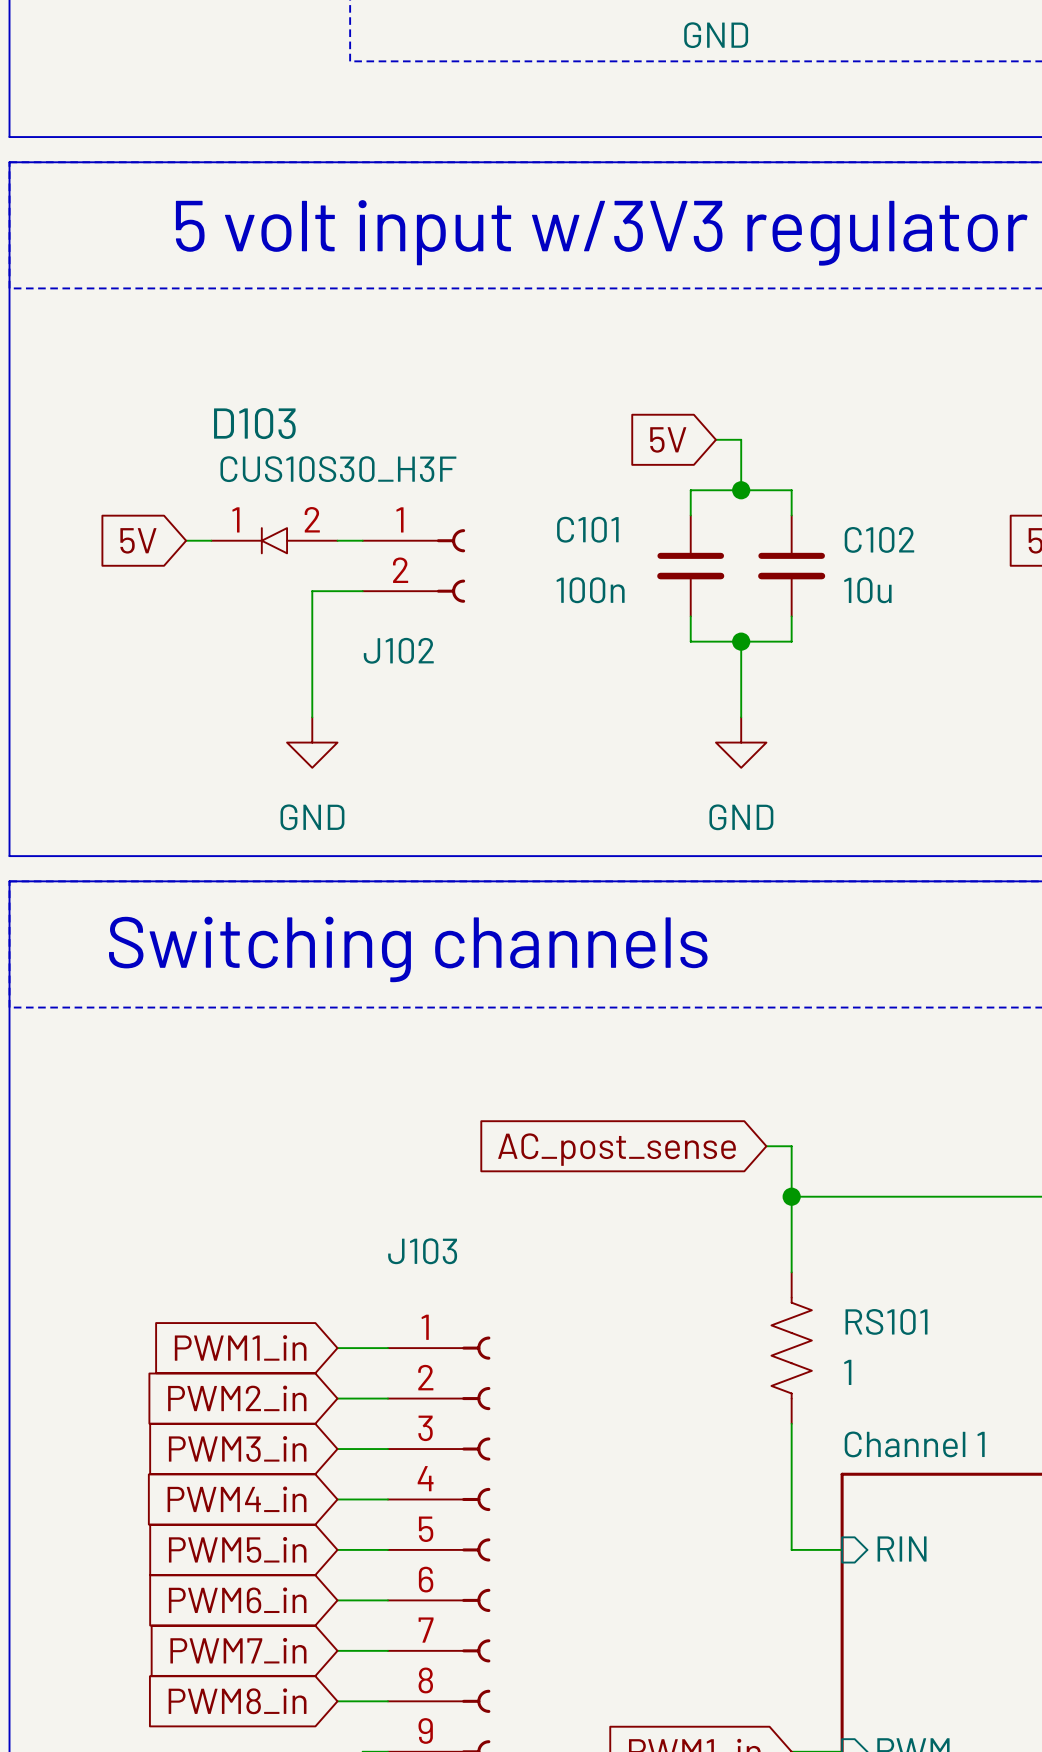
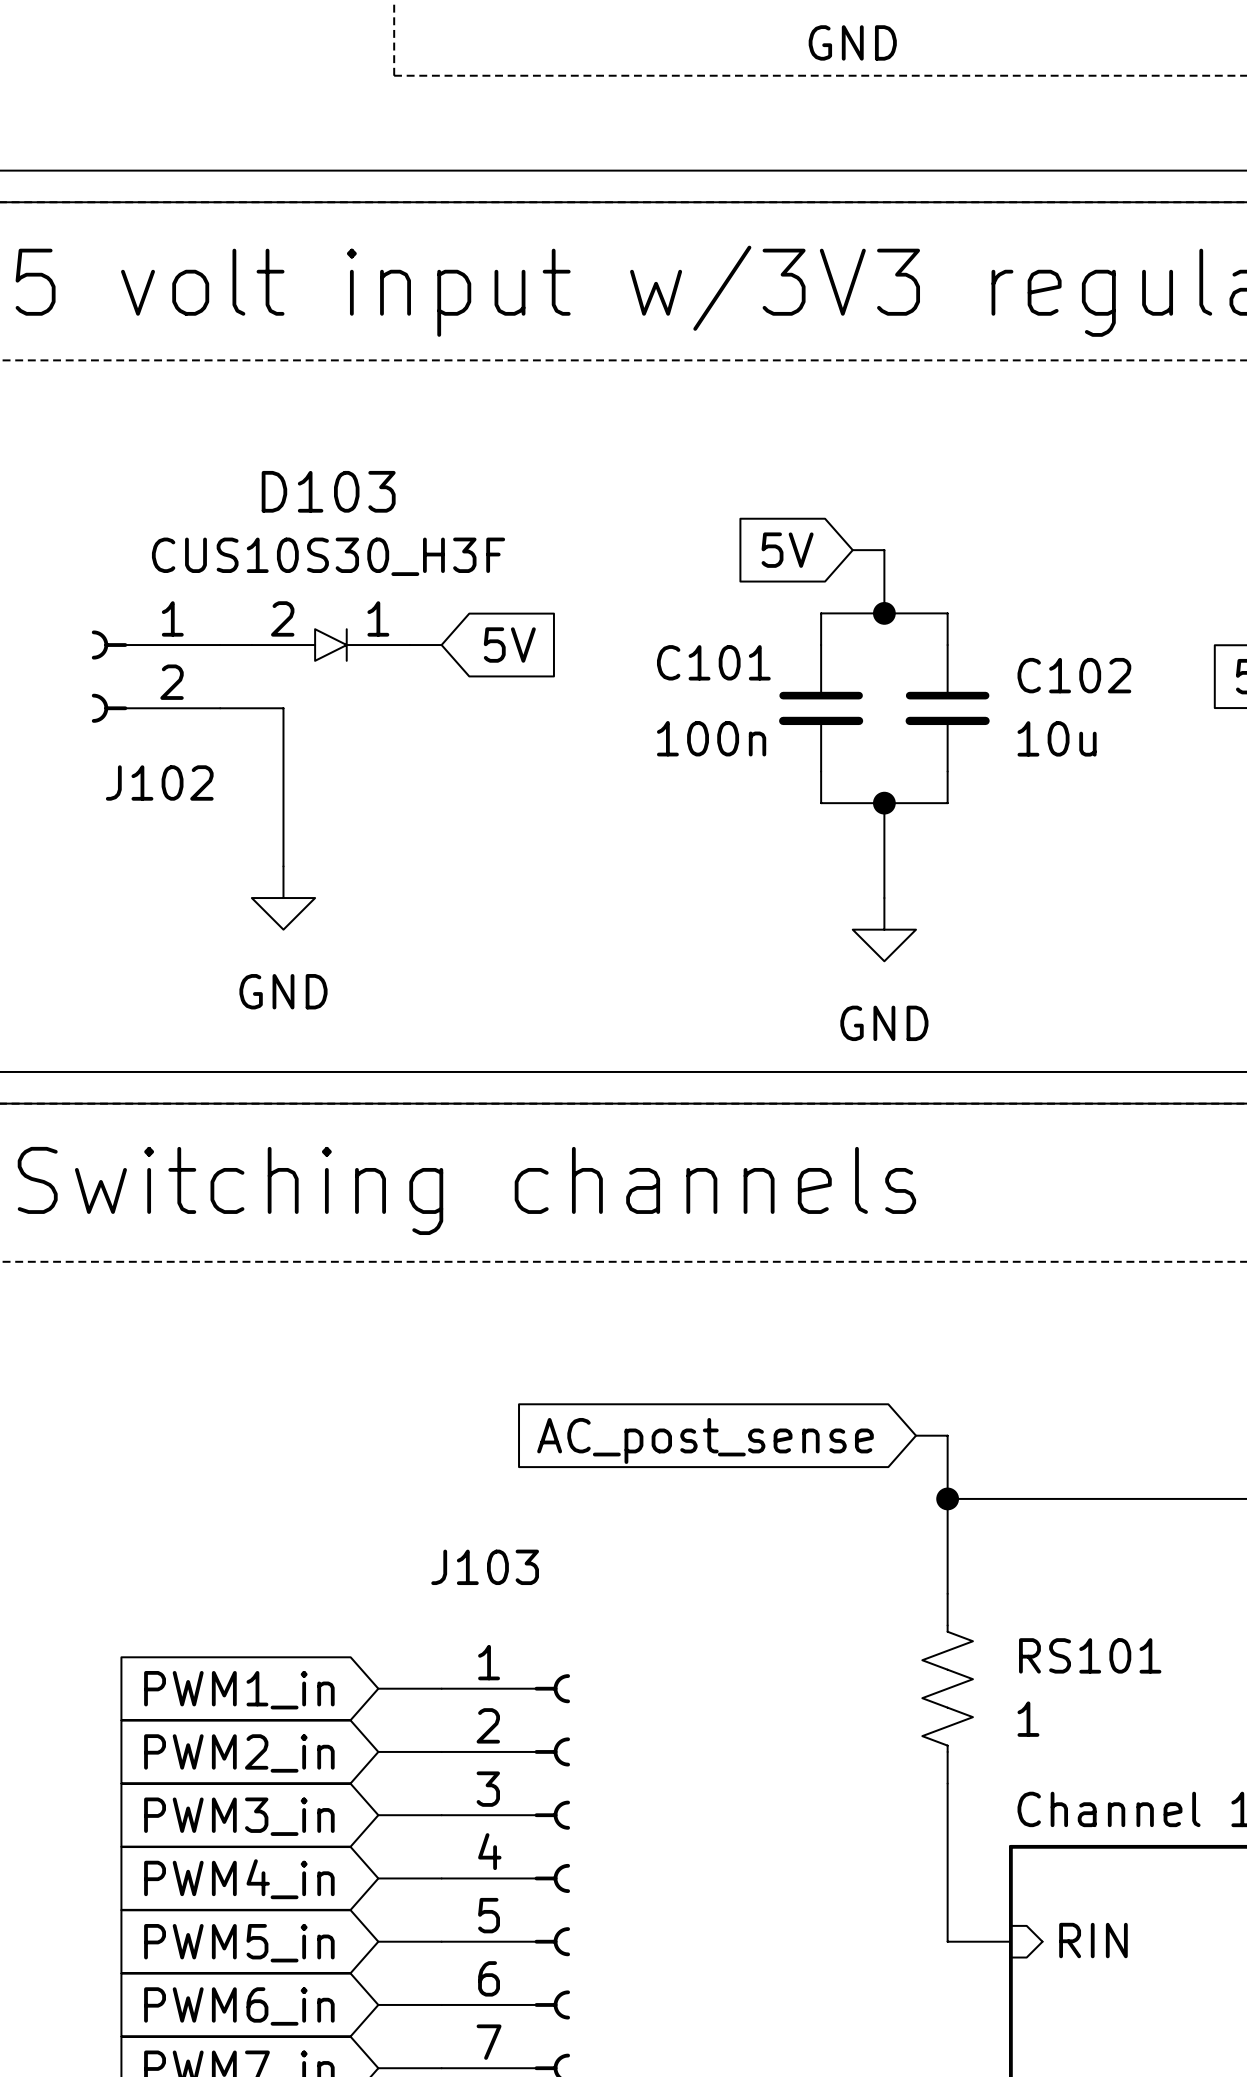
D103 text position: CUS10S30_H3F (338, 469) -> CUS10S30_H3F (328, 556)
global label rotation: 0° (138, 540) -> 180° (509, 645)
global label position: 5V (138, 540) -> 5V (509, 645)
wire: (186, 540) (211, 540) -> (220, 645) (251, 645)
D103 rotation: 0° (274, 540) -> 180° (330, 645)
wire: (337, 540) (362, 540) -> (409, 645) (441, 645)
wire: none -> (220, 708) (283, 708) (283, 866)
J102 position: (413, 565) -> (156, 676)
J102 flip: as is (451, 565) -> left-right (109, 676)
wire: (362, 591) (312, 591) (312, 717) -> none
power symbol position: GND (312, 742) -> GND (283, 898)

